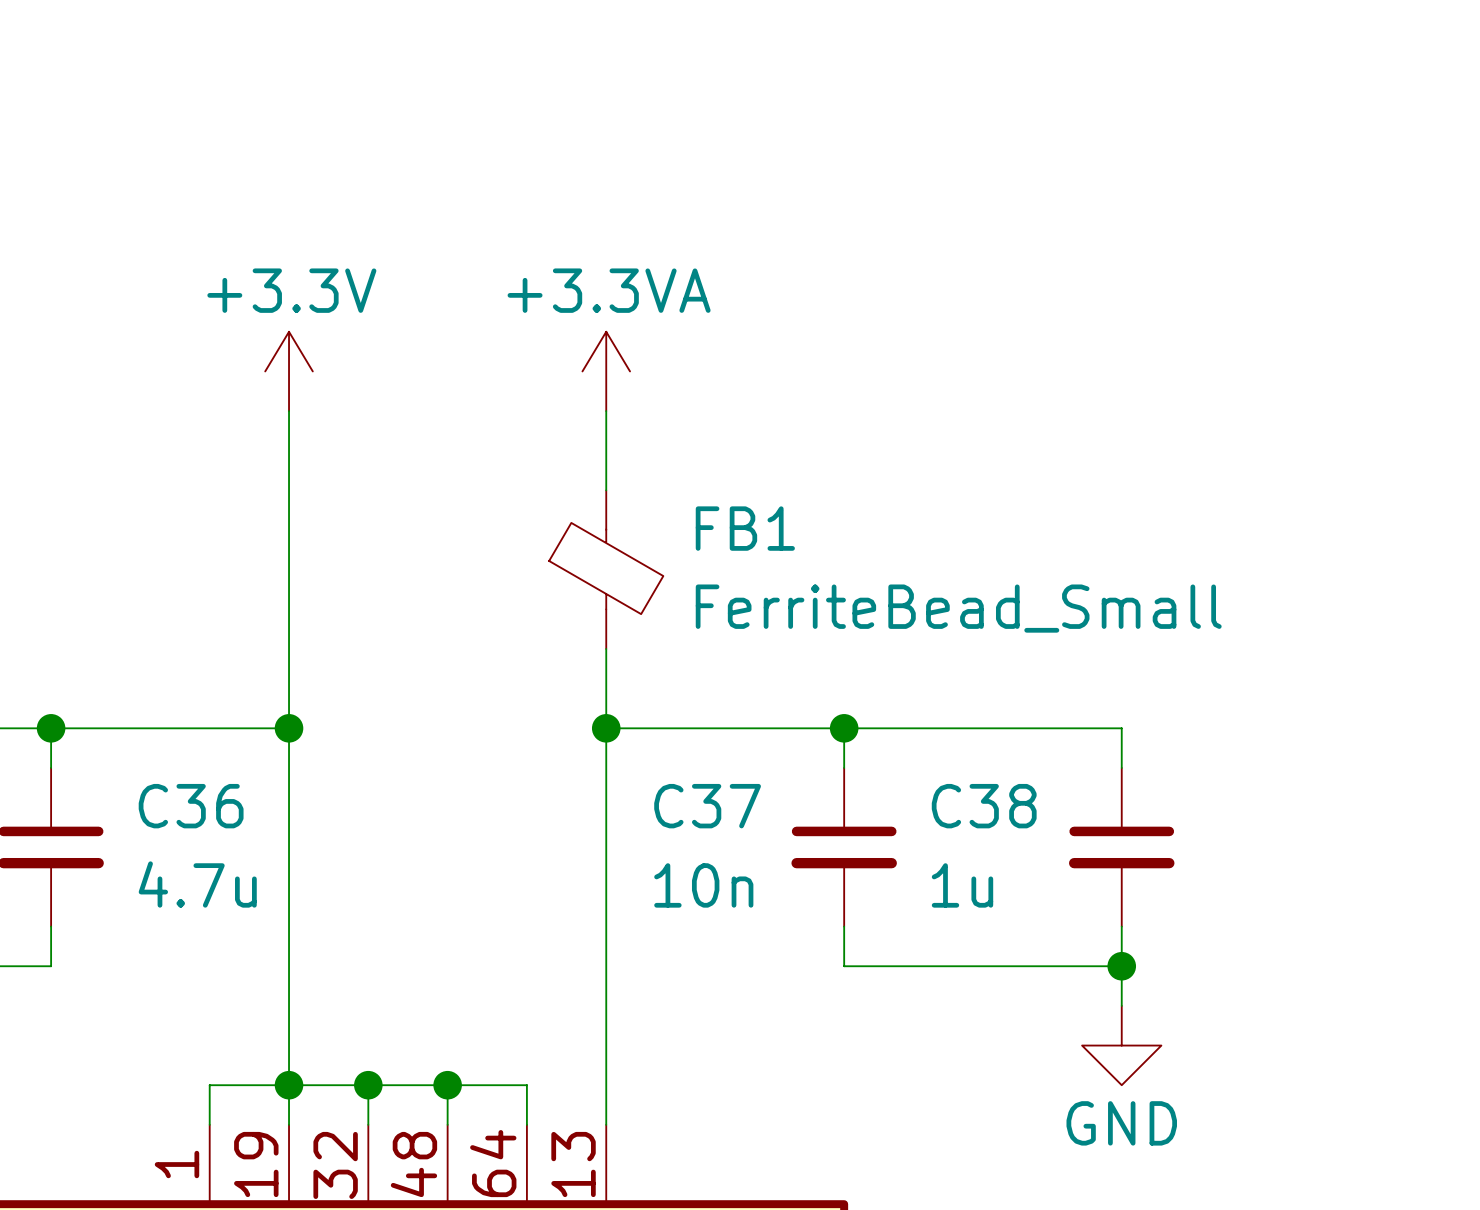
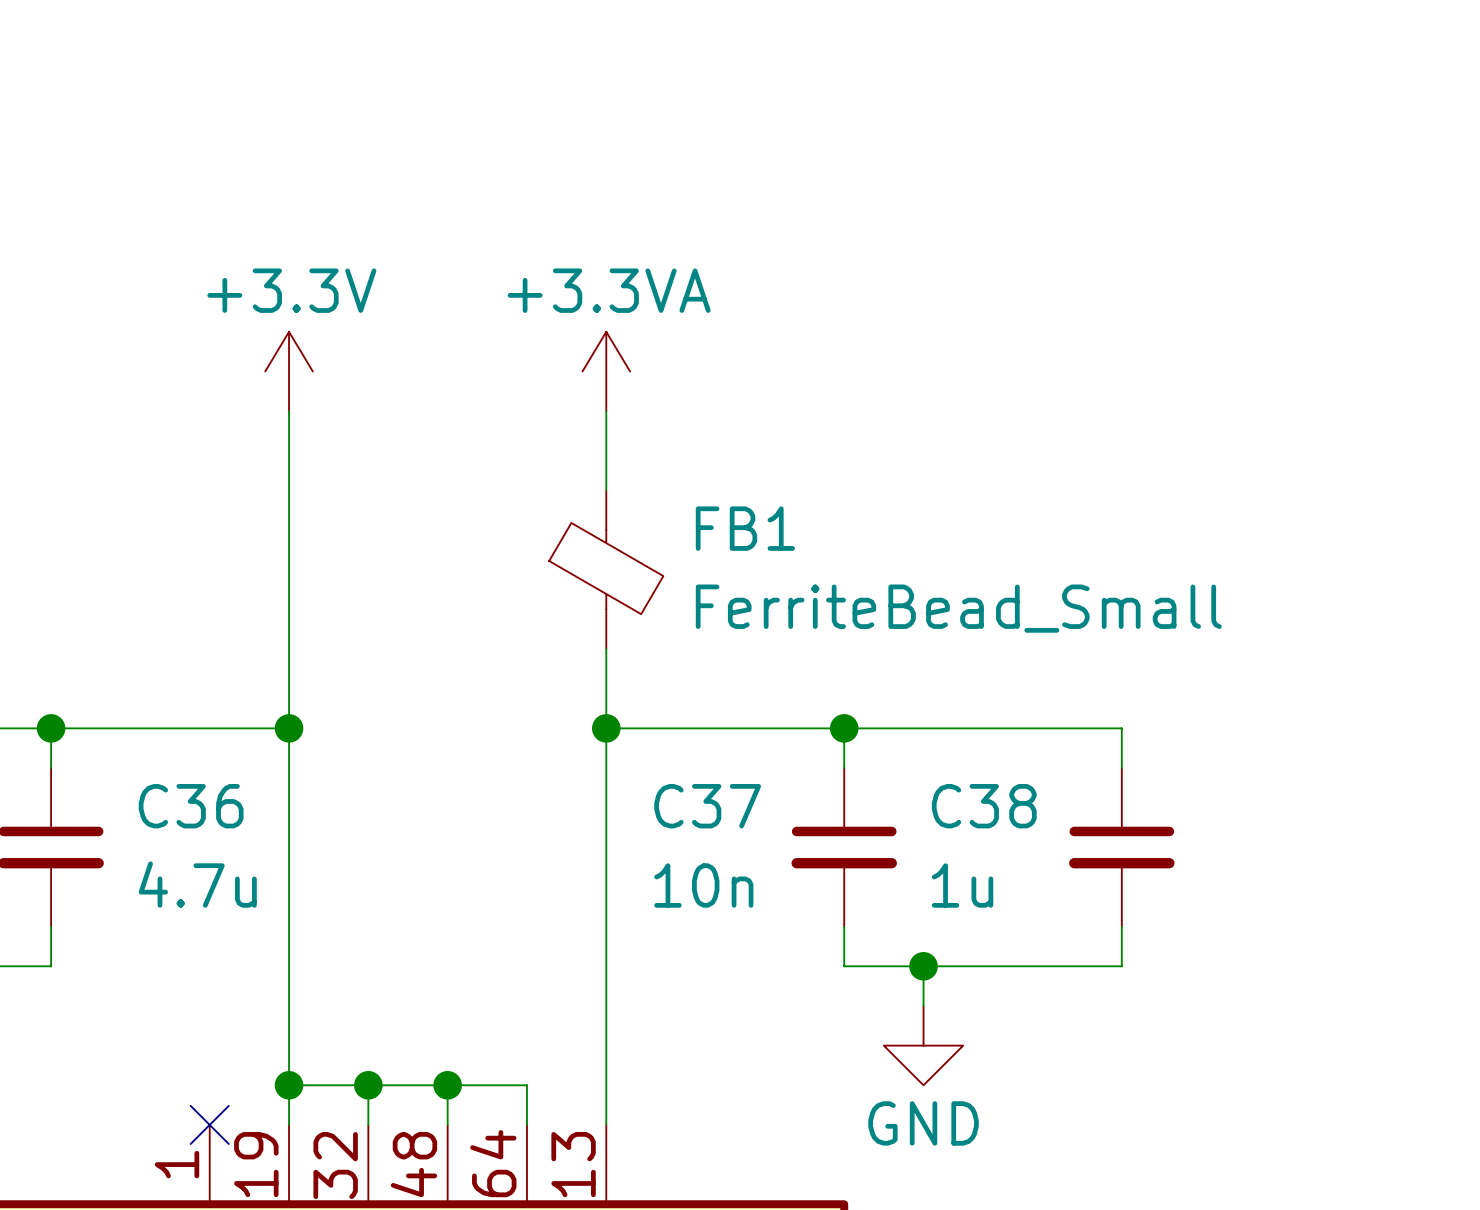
junction: none -> (923, 966)
wire: (1121, 966) (1121, 1005) -> (923, 966) (923, 1005)
junction: (1121, 966) -> none
power symbol position: GND (1121, 1045) -> GND (923, 1045)
wire: (289, 1085) (209, 1085) (209, 1124) -> none
no-connect mark: none -> (209, 1124)

